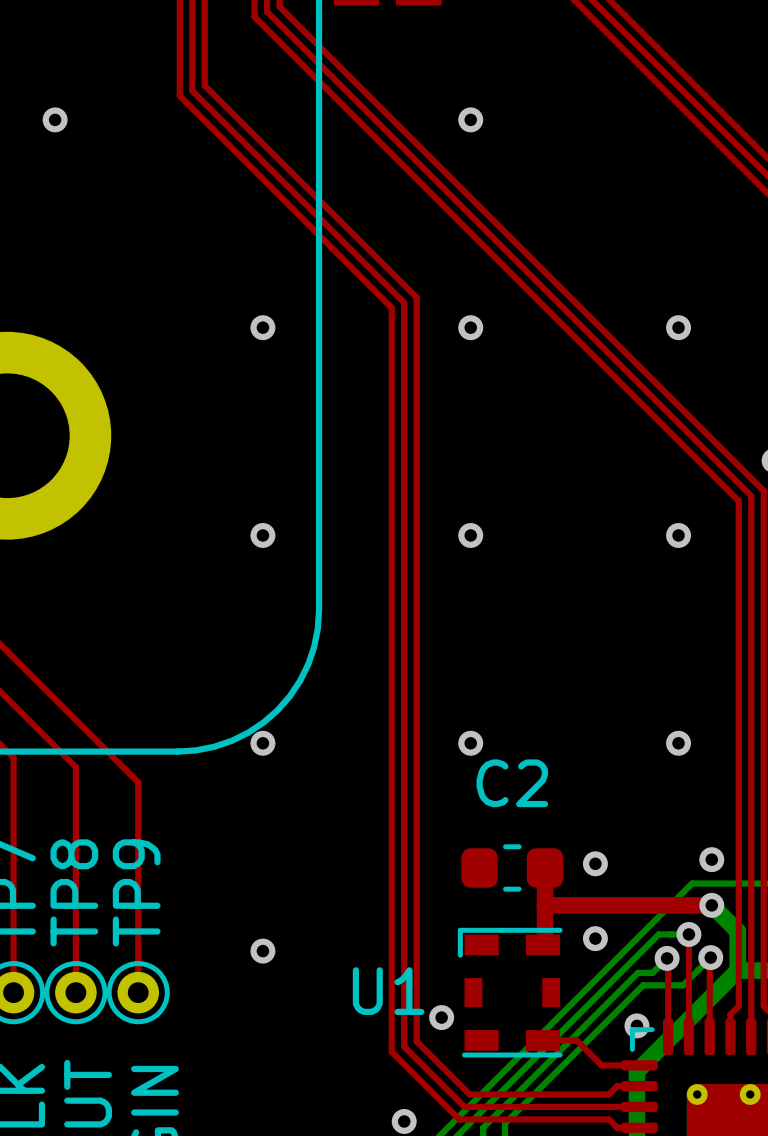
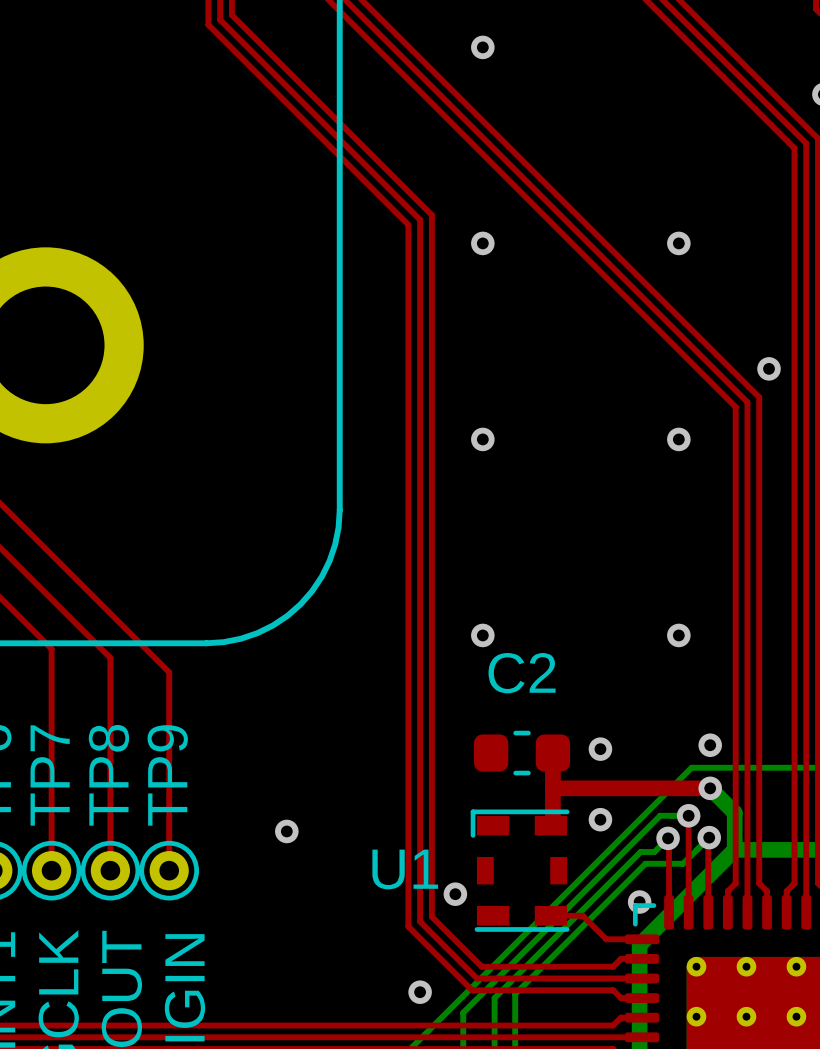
via: (55, 119) -> none
via: (262, 327) -> none
via: (262, 535) -> none
via: (262, 743) -> none

